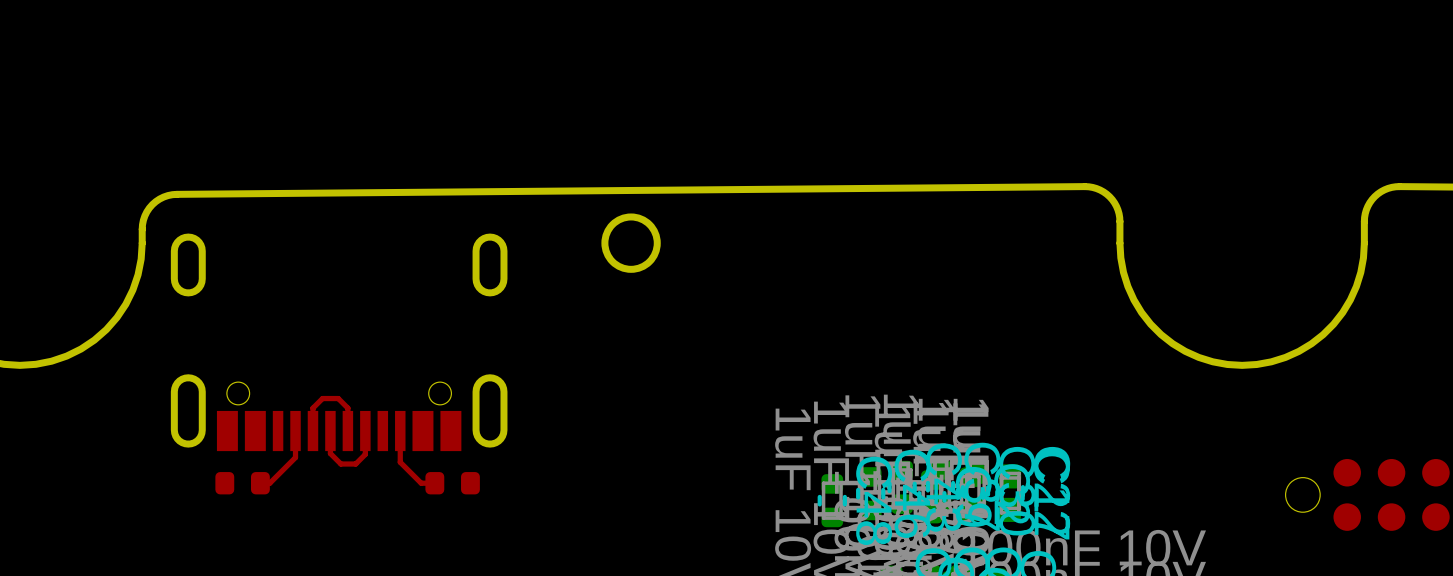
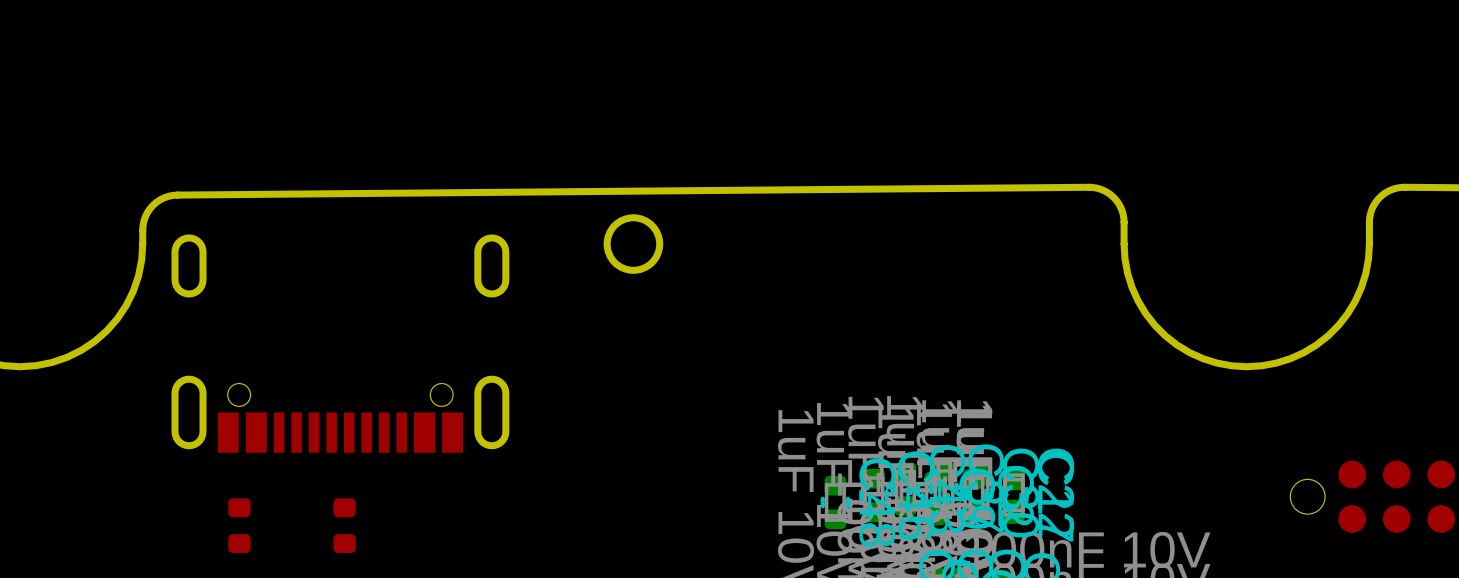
top track: (295, 431) (295, 457) (269, 483) (260, 483) -> none
top track: (347, 431) (347, 408) (338, 398) (322, 398) (312, 408) (312, 431) -> none
top track: (365, 431) (365, 454) (355, 464) (340, 464) (330, 453) (330, 431) -> none
top track: (400, 431) (400, 462) (421, 483) (434, 483) -> none
part rotation: 0° (242, 483) -> 90° clockwise (239, 525)
part position: (242, 483) -> (239, 525)
part: (452, 483) -> none
part: none -> (344, 525)

